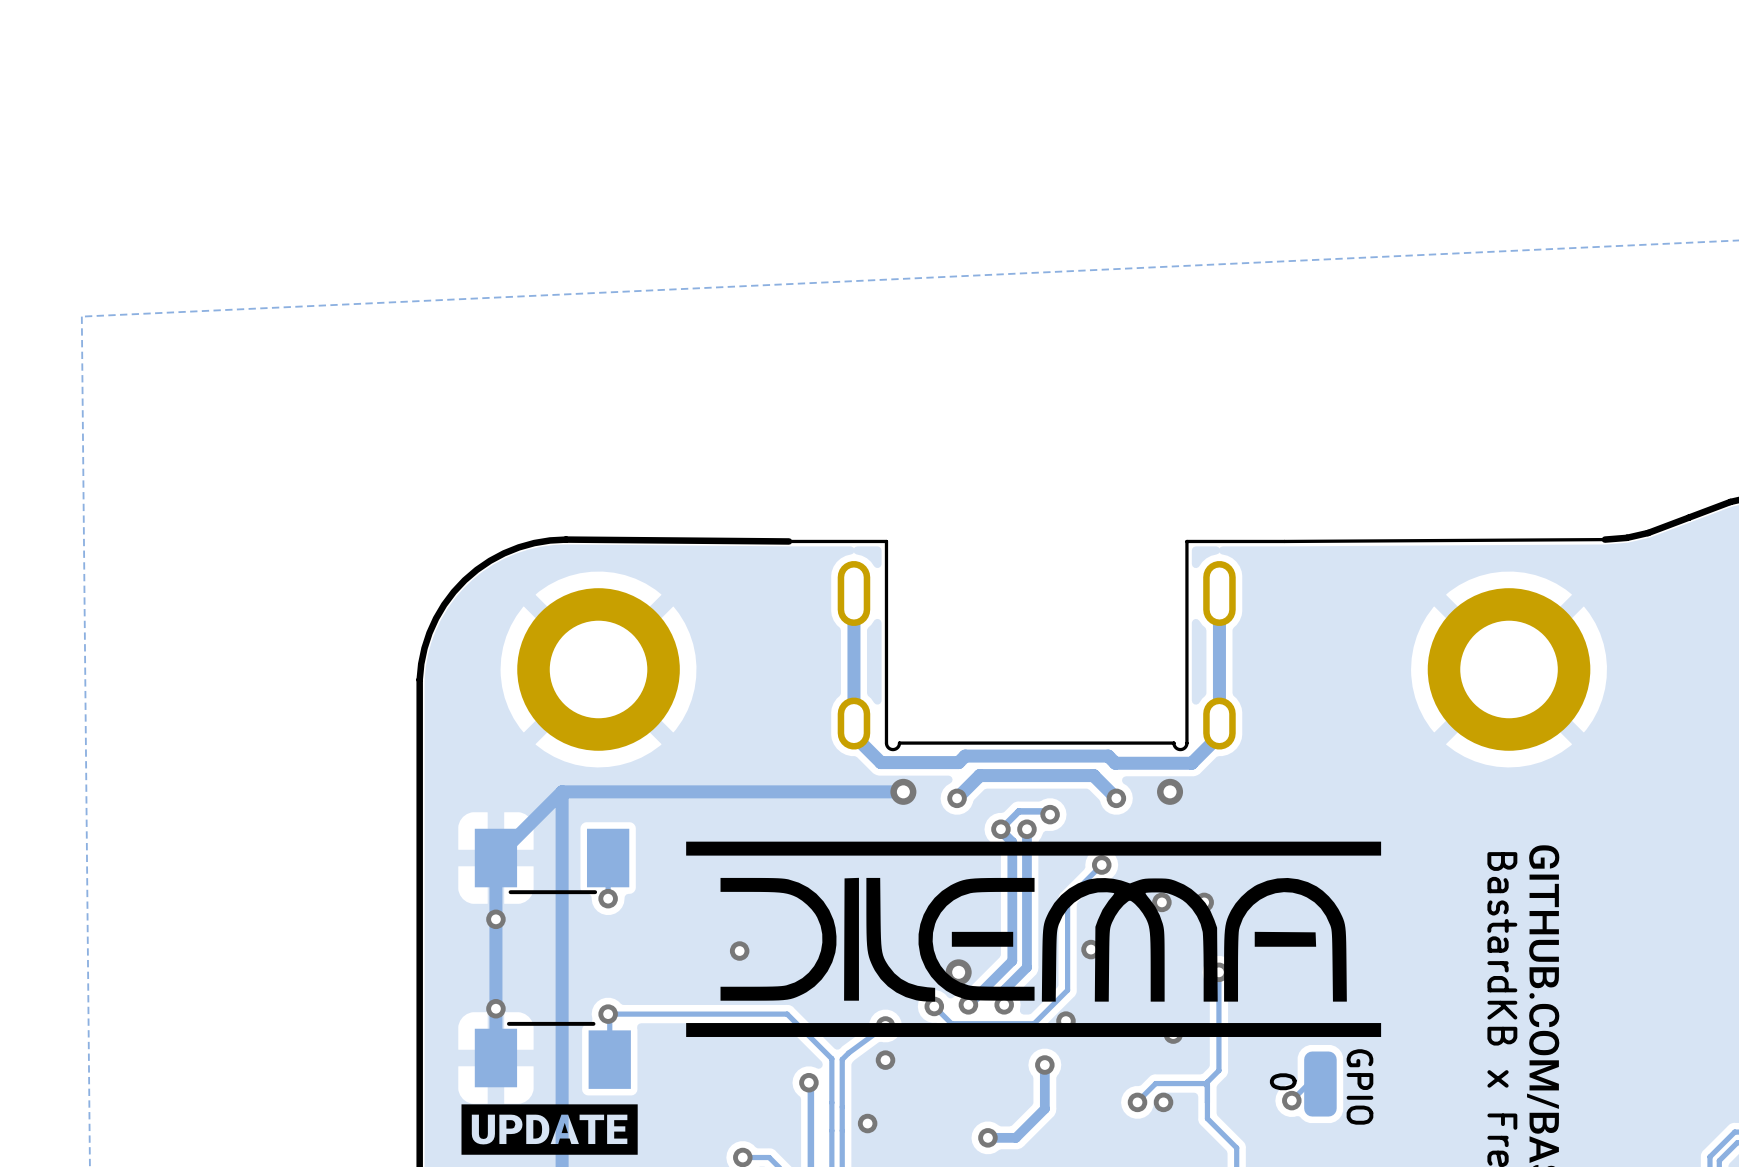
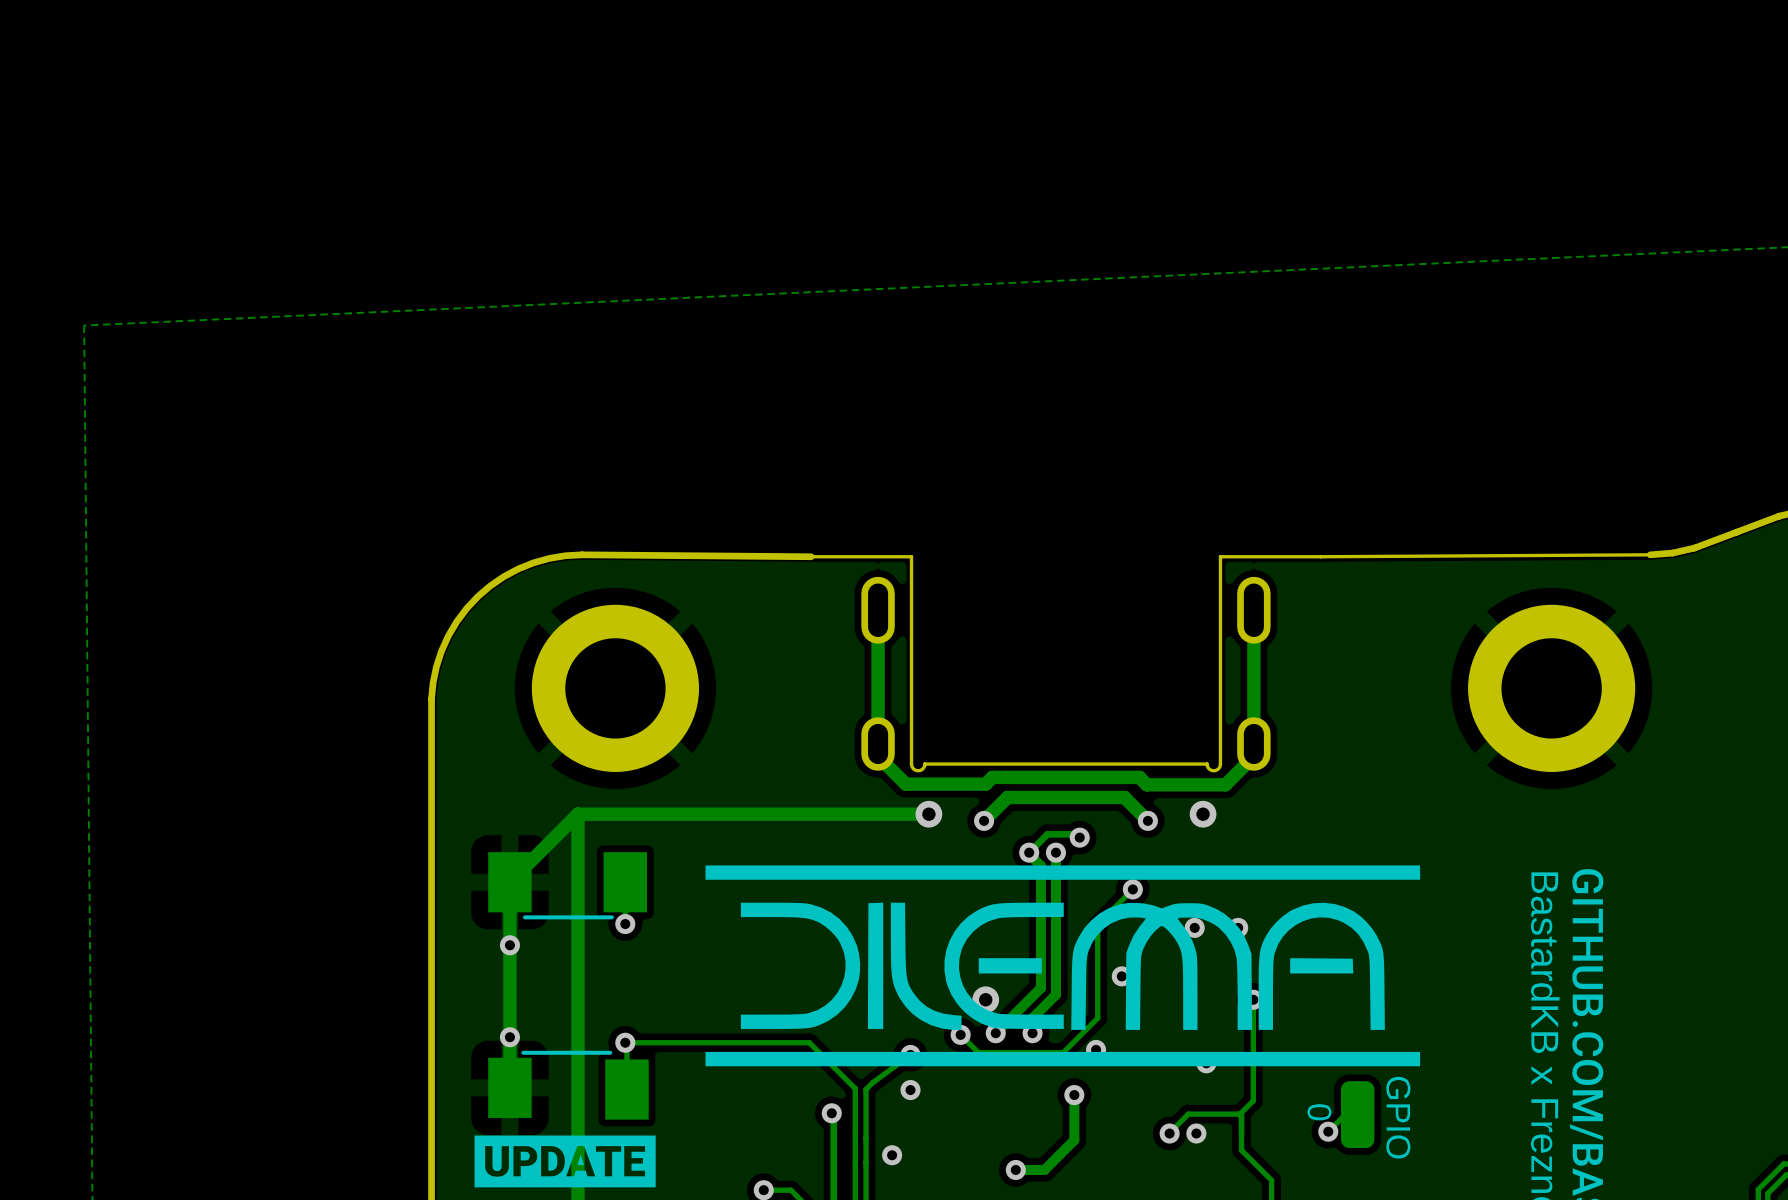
via: (739, 951) -> none

